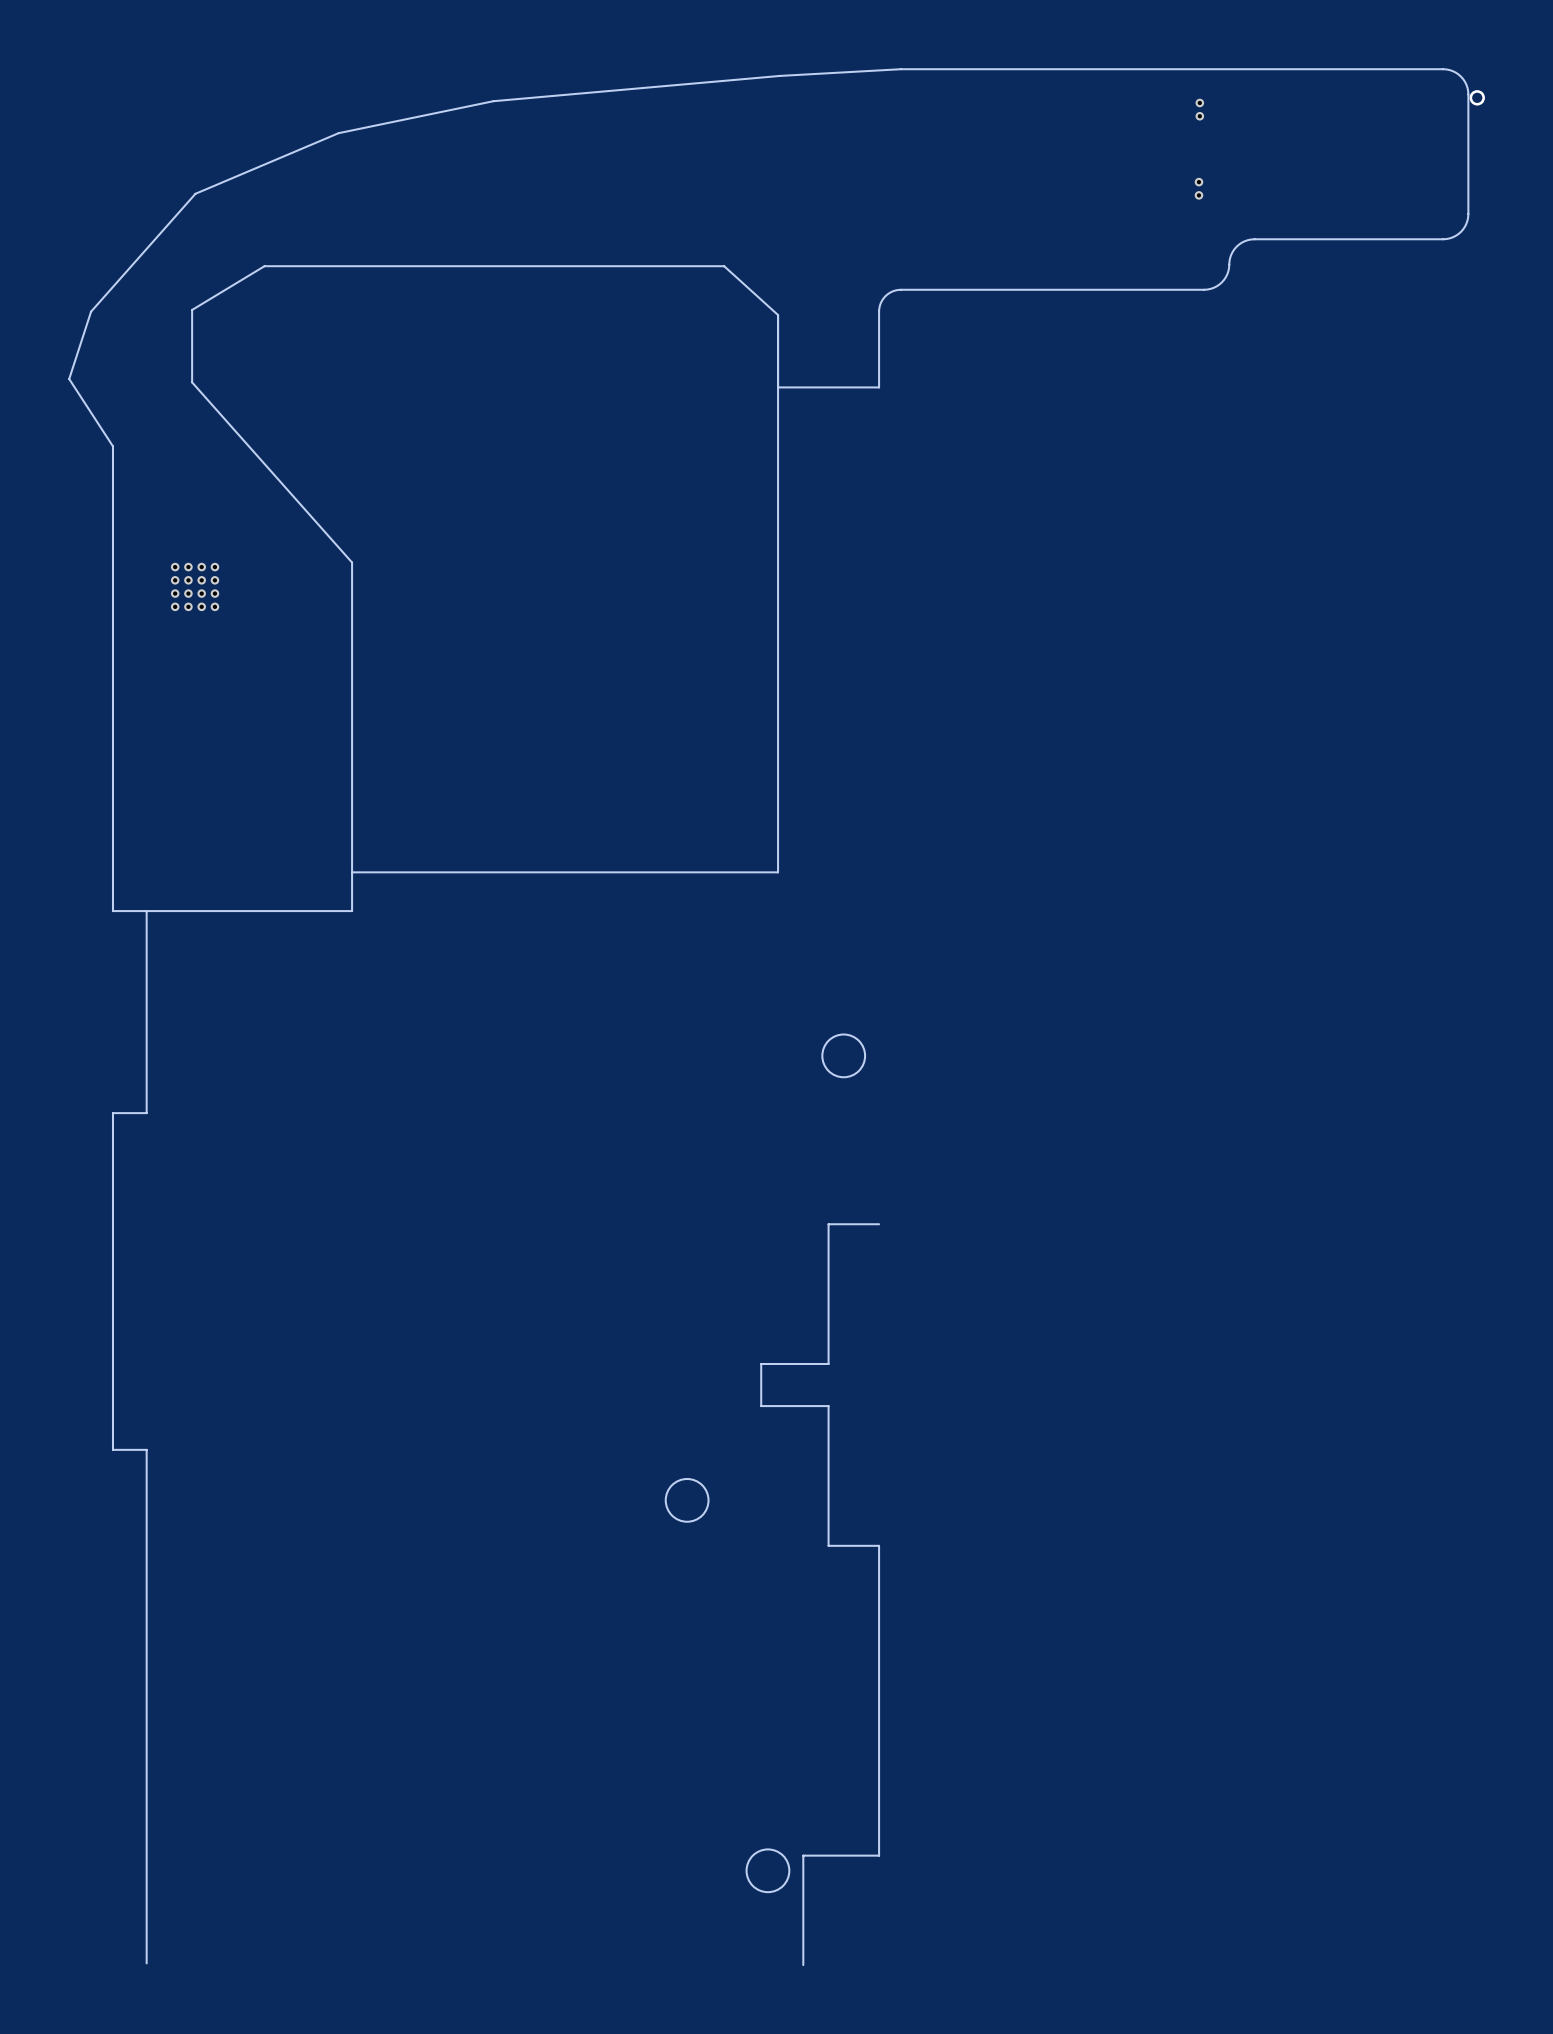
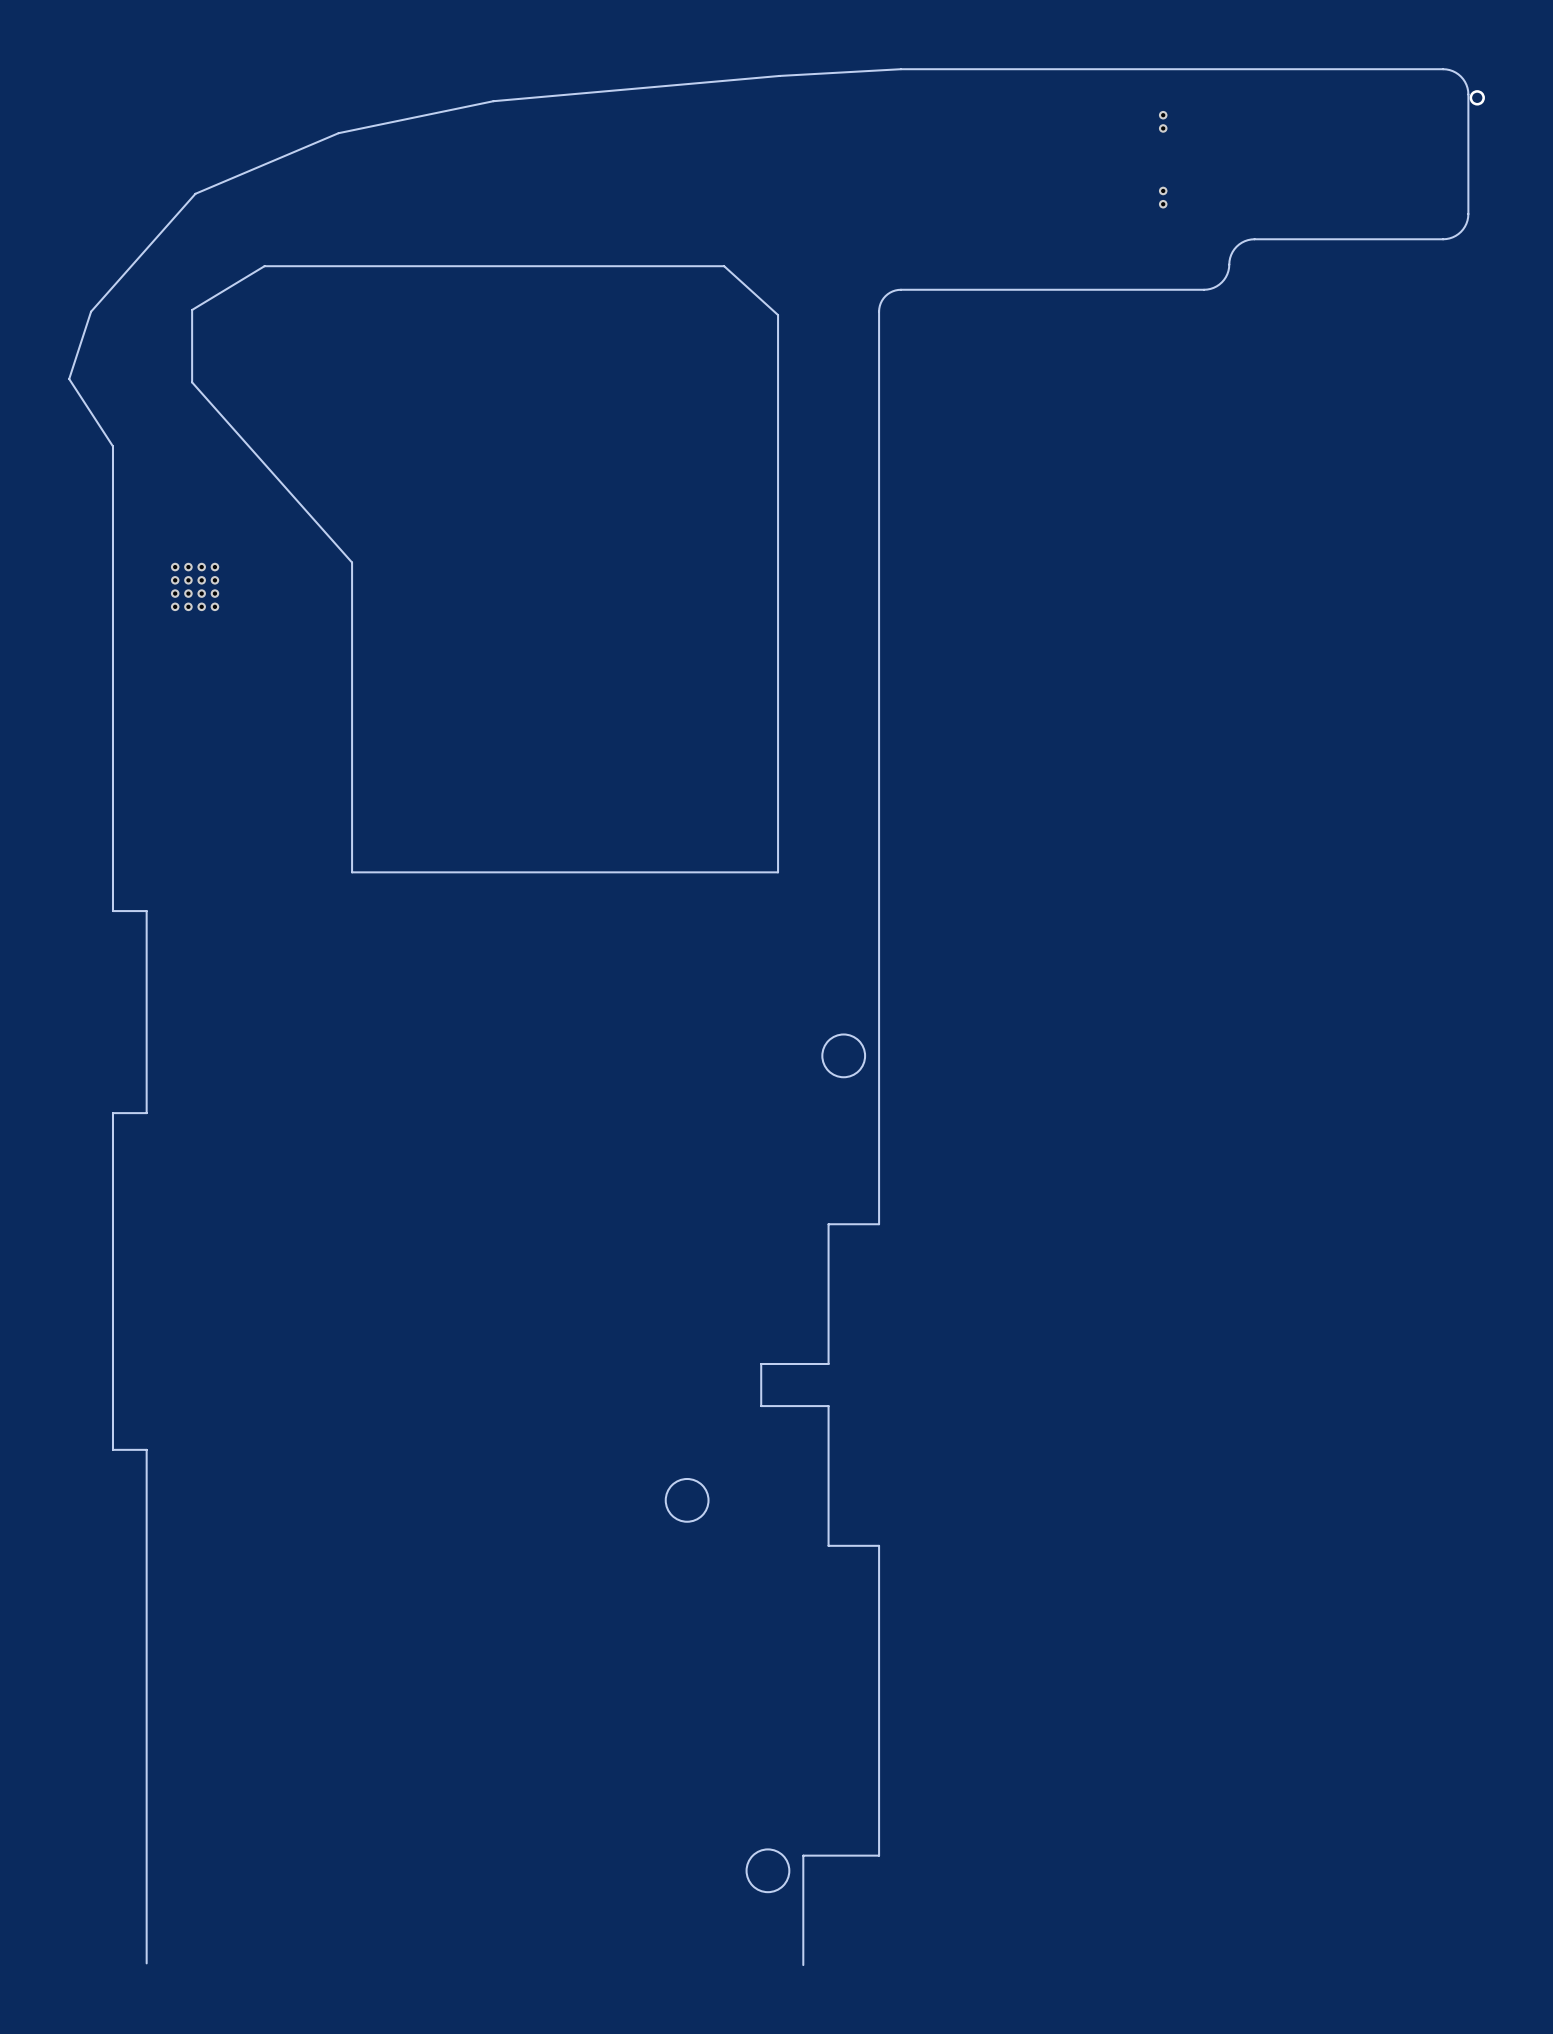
part: (1199, 109) -> none
part: none -> (1163, 121)
part position: (1198, 188) -> (1163, 197)
board edge: (879, 387) (778, 387) -> (879, 387) (879, 1224)
board edge: (352, 872) (352, 911) (146, 911) -> none

